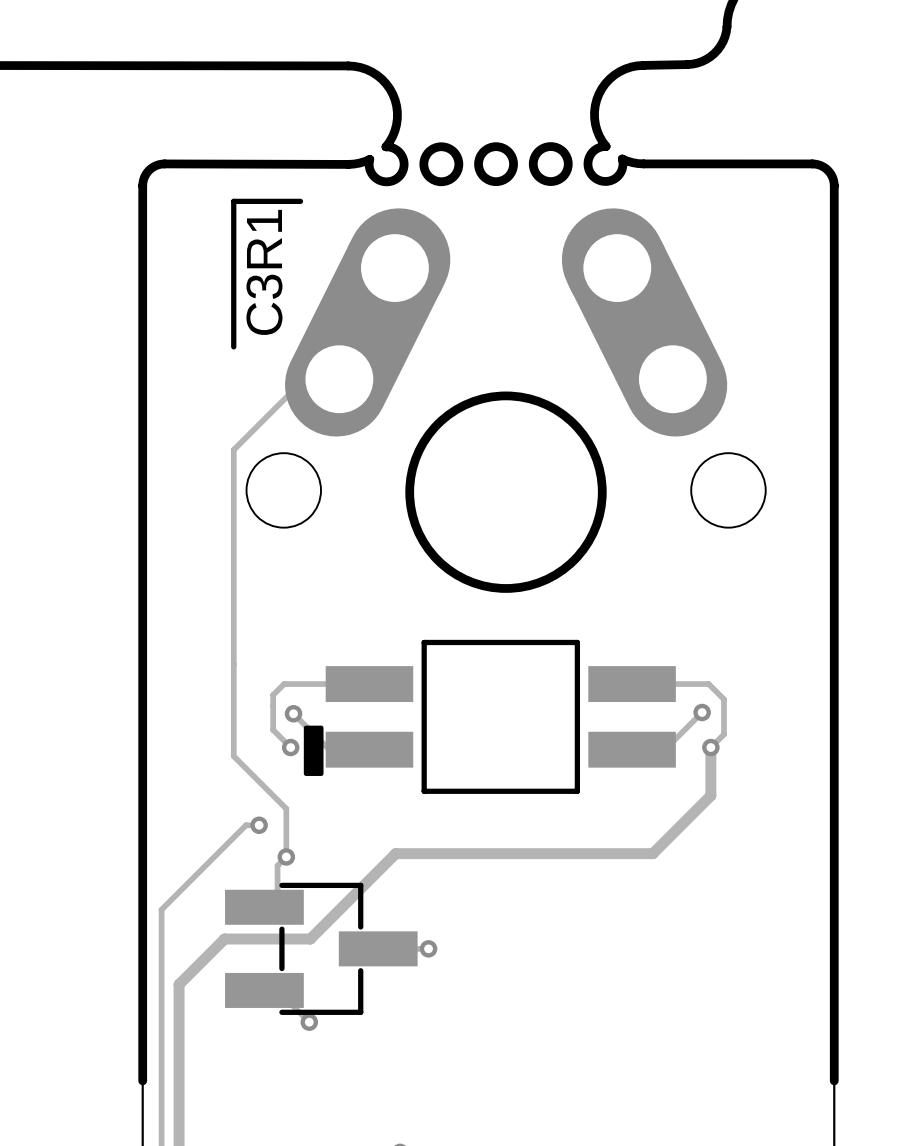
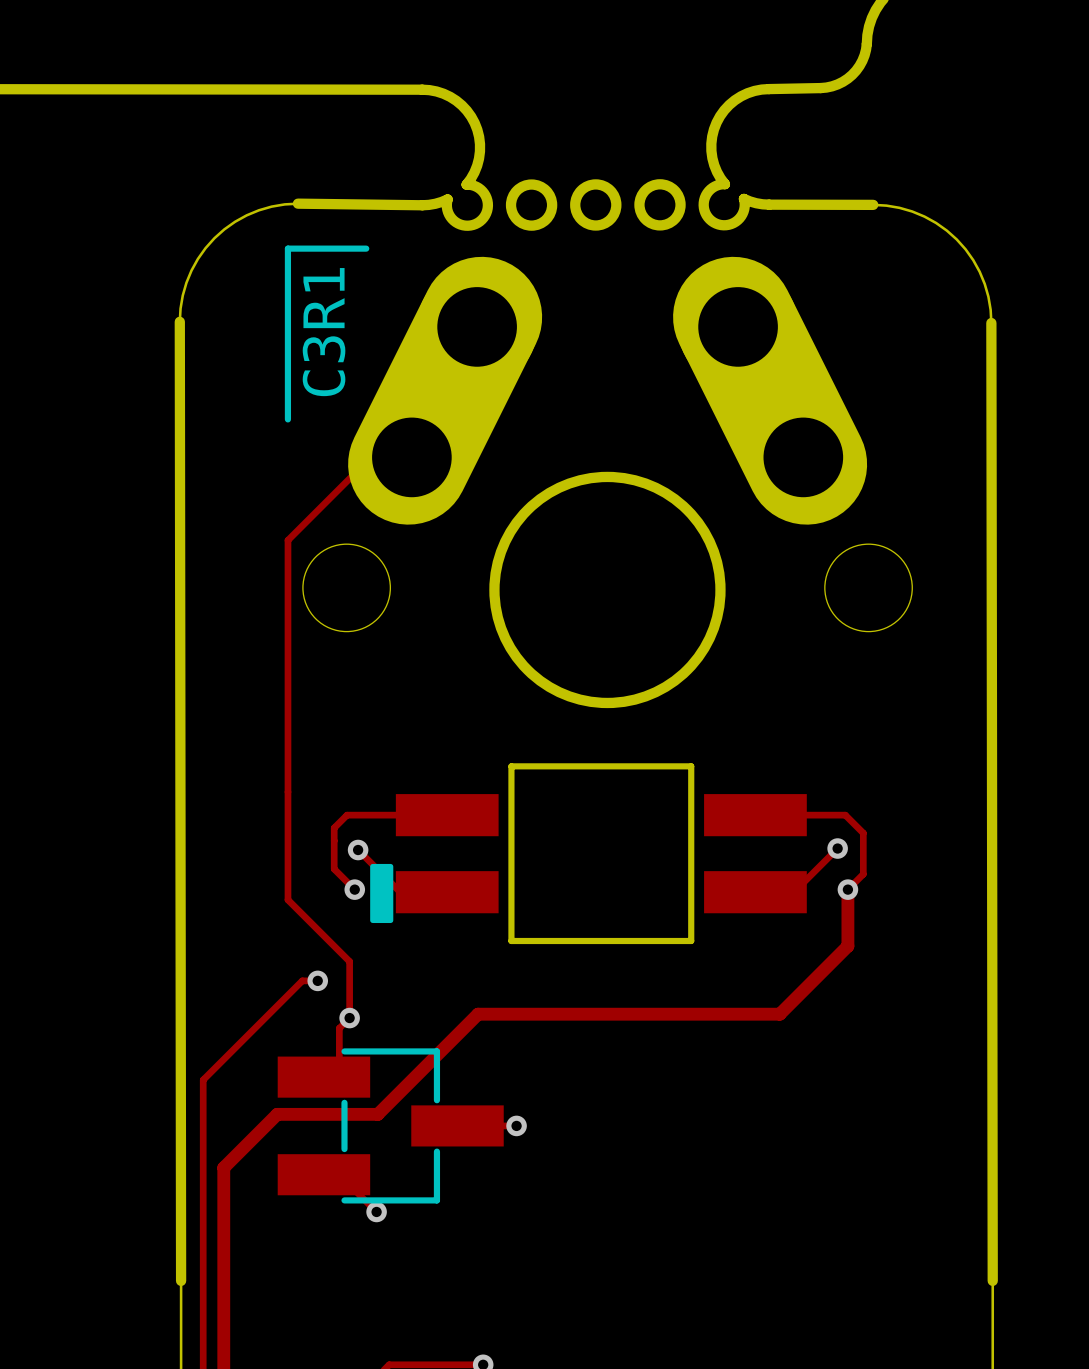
board edge: (643, 163) (815, 164) (827, 170) (833, 180) (834, 1080) -> (769, 204) (886, 205) (924, 216) (946, 230) (965, 249) (979, 271) (988, 296) (991, 323) (992, 1280)
board edge: (348, 164) (161, 164) (151, 168) (143, 180) (142, 1080) -> (422, 205) (297, 203) (258, 210) (235, 221) (214, 238) (191, 270) (182, 295) (179, 321) (181, 1280)

